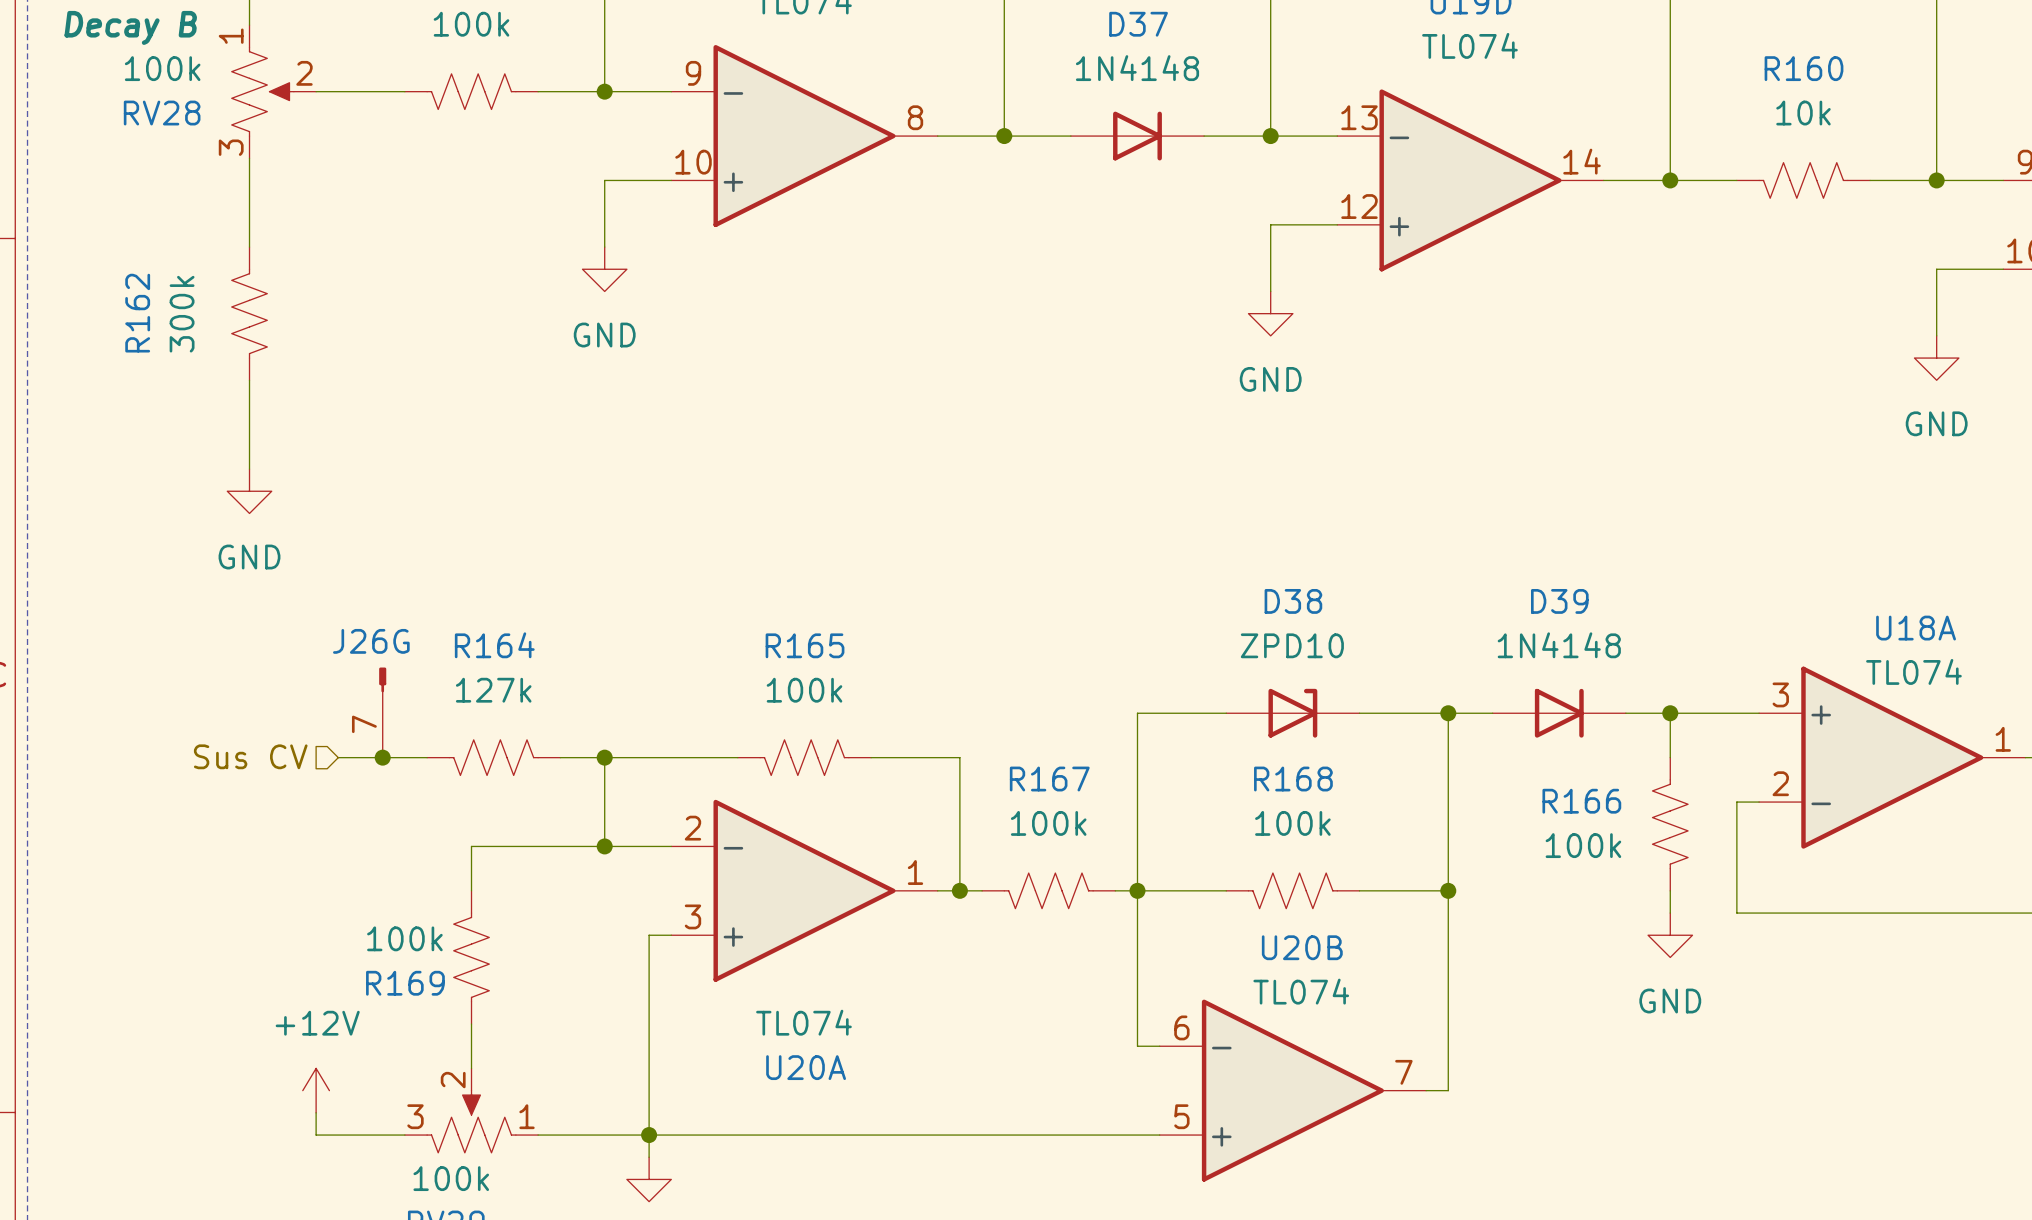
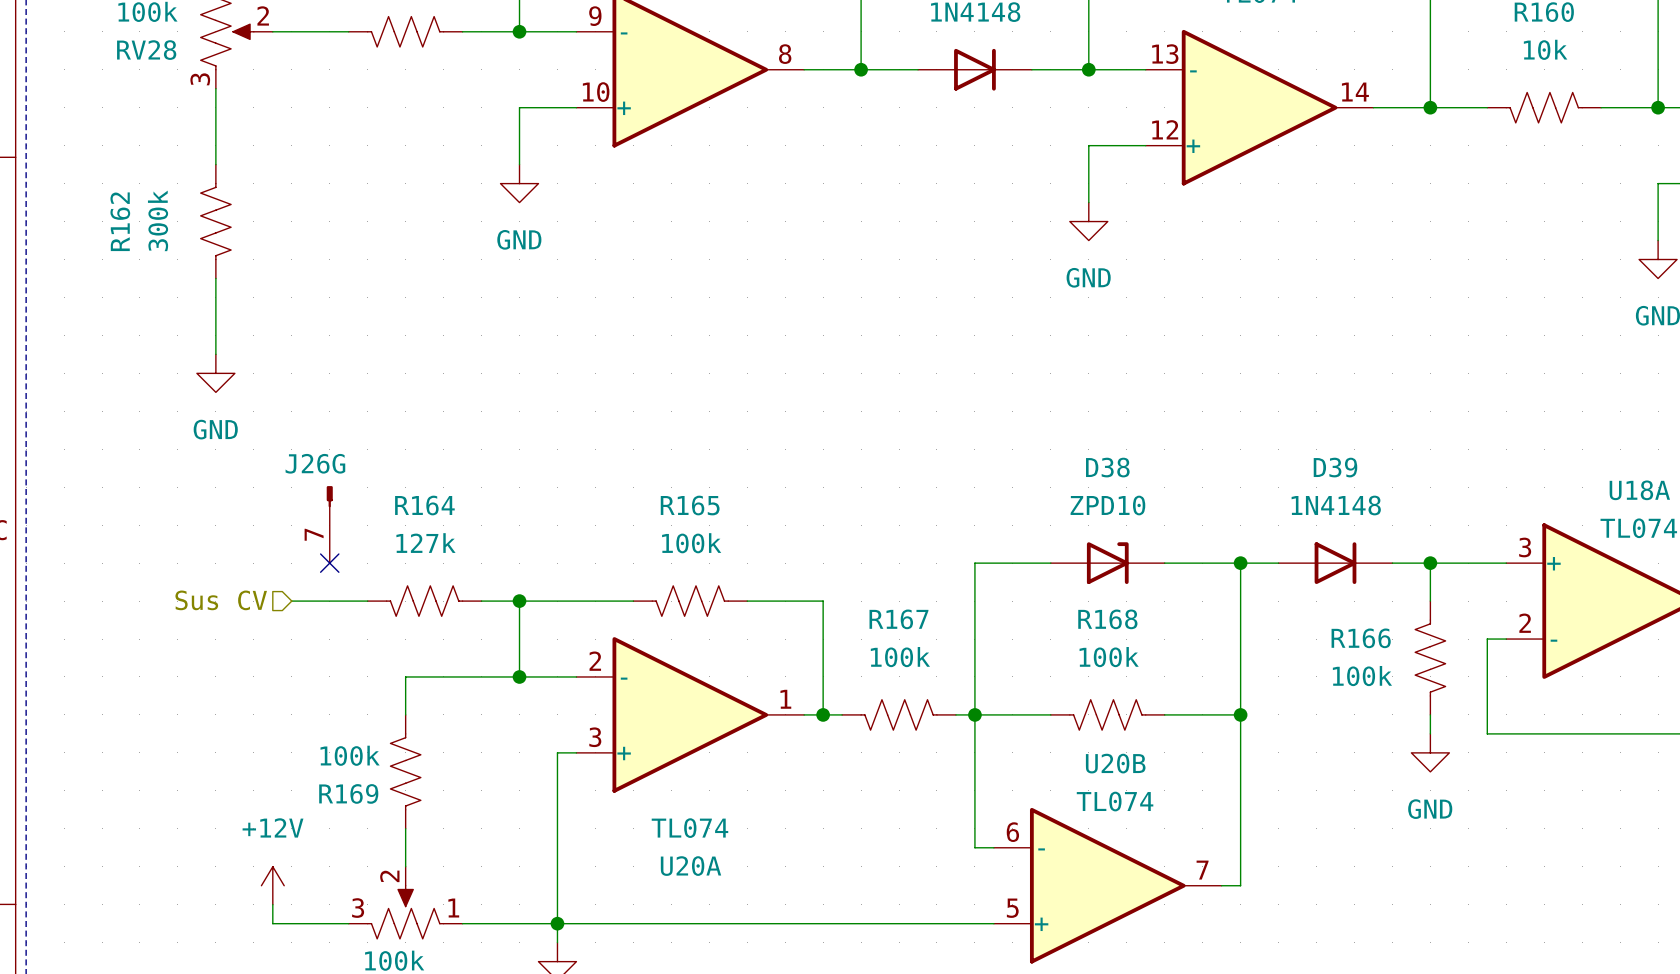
J26G position: (382, 712) -> (329, 524)
no-connect mark: none -> (329, 563)
junction: (382, 757) -> none

